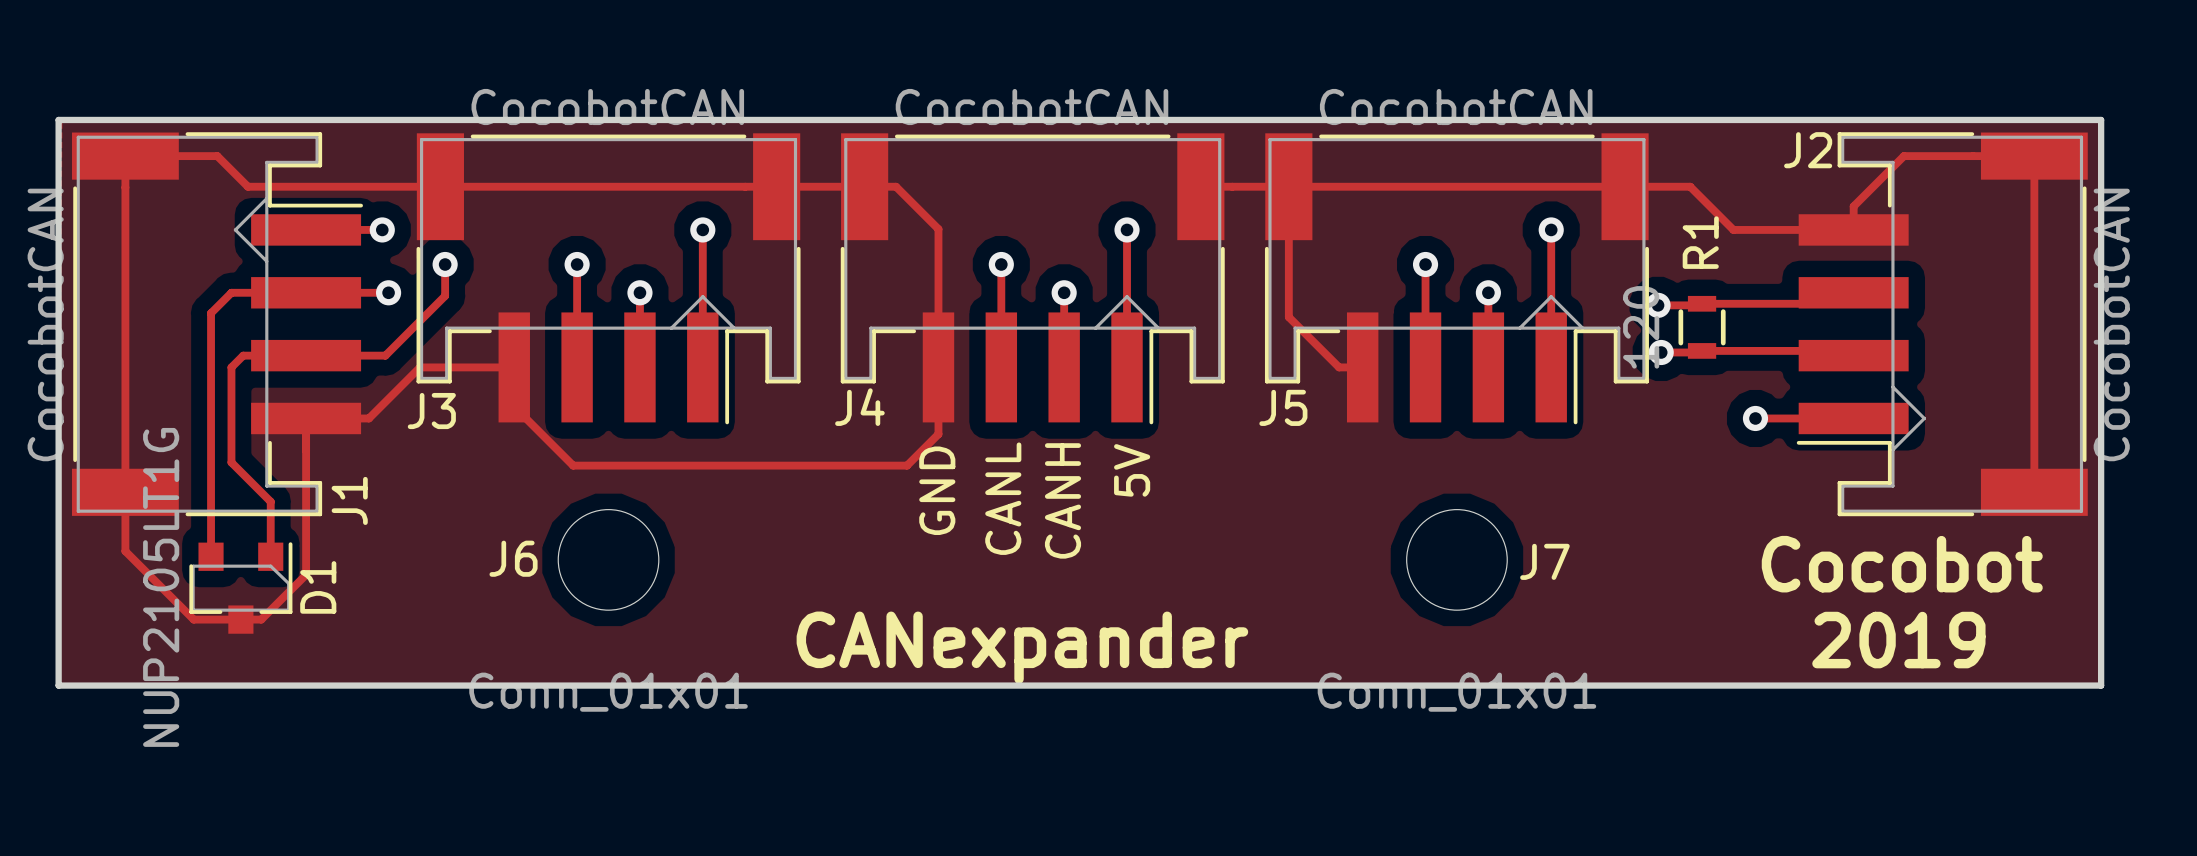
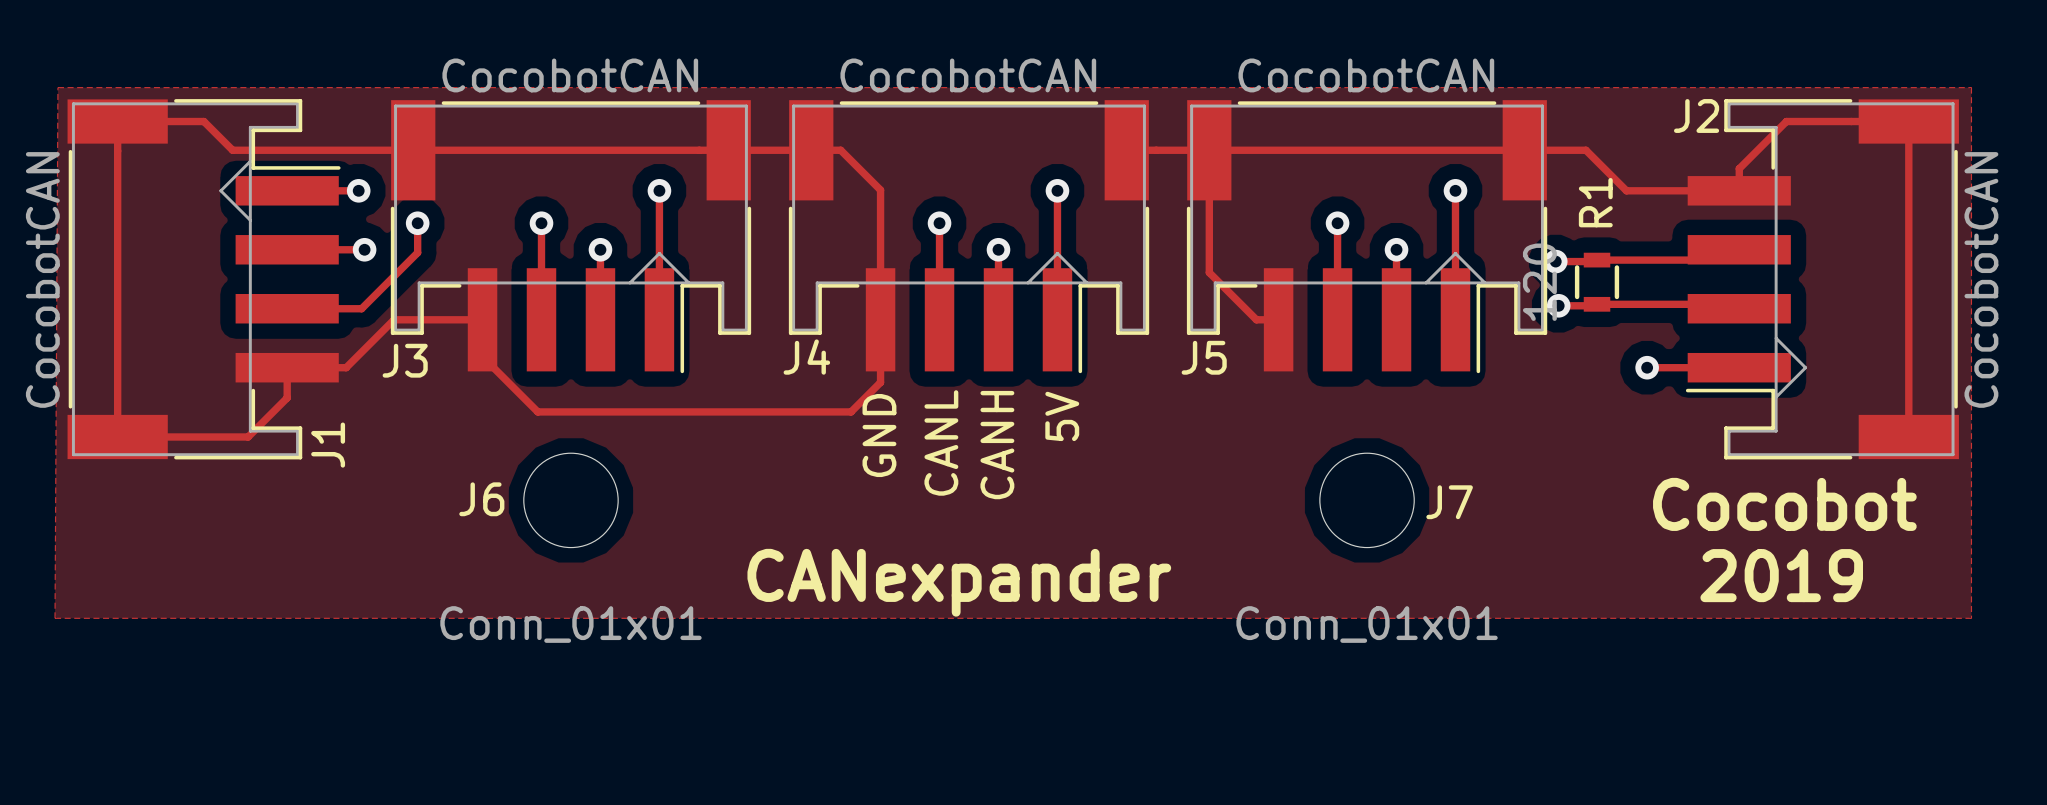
board edge: (58, 119) (2101, 119) (2101, 685) (58, 685) (58, 119) -> none
track: (306, 292) (231, 292) (211, 313) (211, 556) -> none
track: (306, 355) (243, 355) (231, 367) (231, 462) (270, 501) (270, 556) -> none
track: (306, 450) (306, 574) (261, 619) (193, 619) (125, 551) (125, 492) -> (287, 397) (248, 436) (117, 436)
D1: NUP2105LT1G (240, 588) -> none

